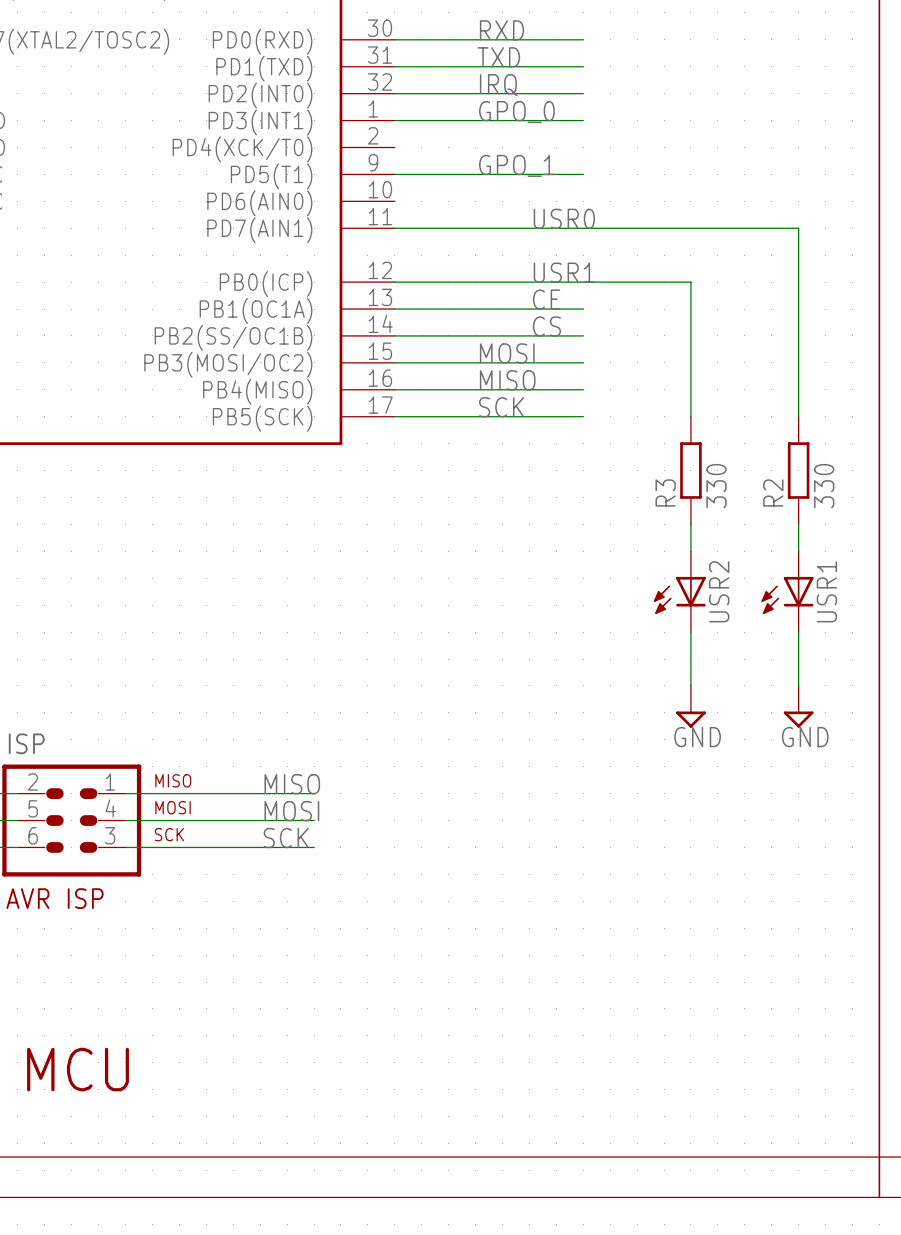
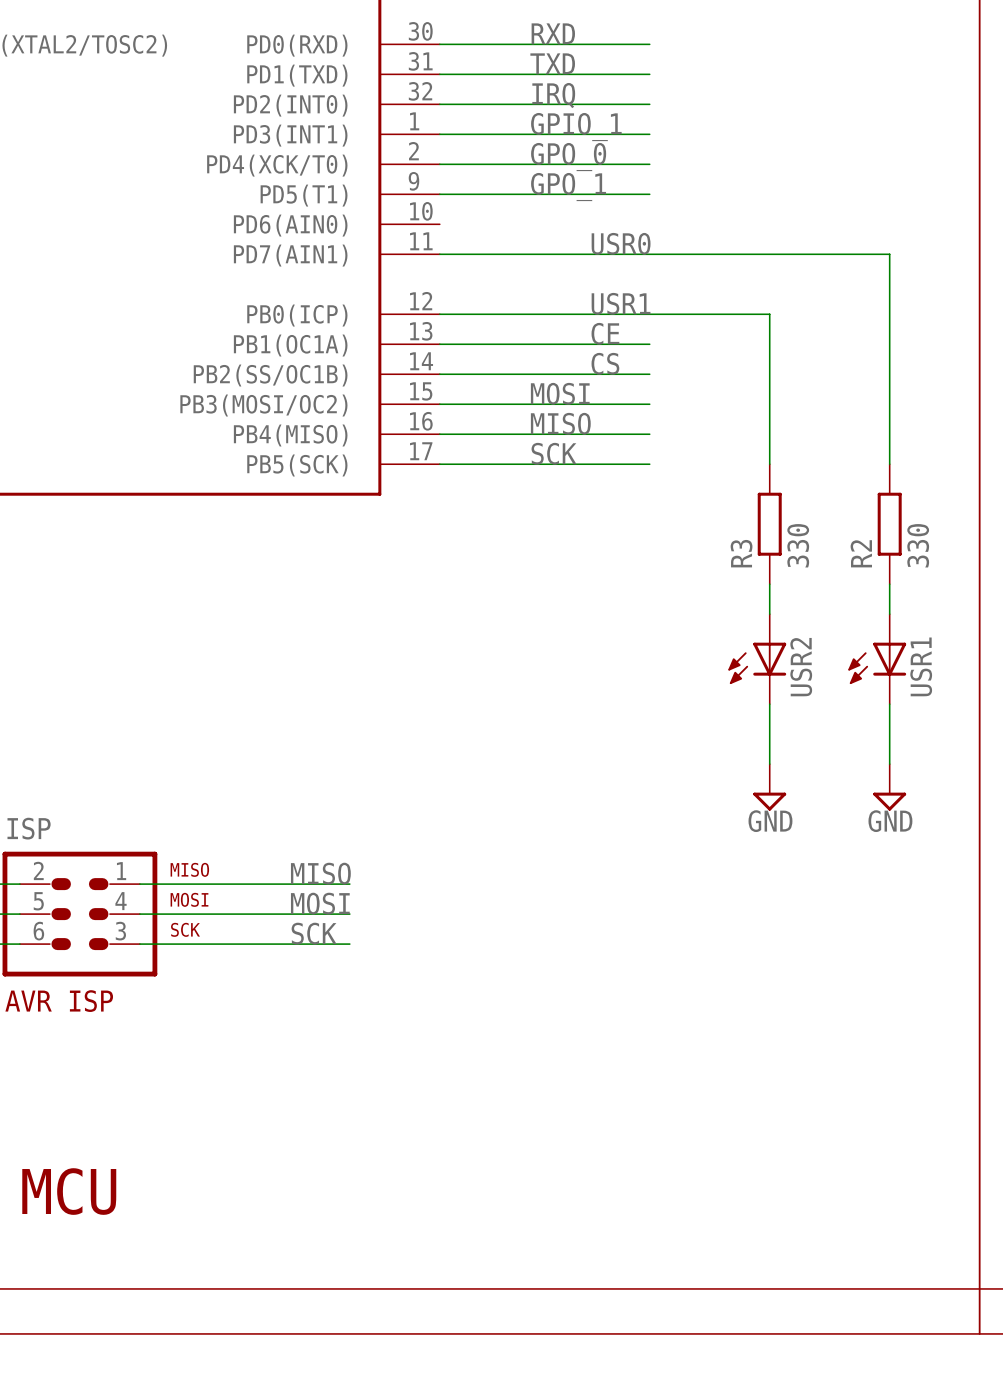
label: GPO_0 (516, 112) -> GPIO_1 (576, 127)
label: none -> GPO_0 (568, 157)
wire: none -> (439, 164) (649, 164)

